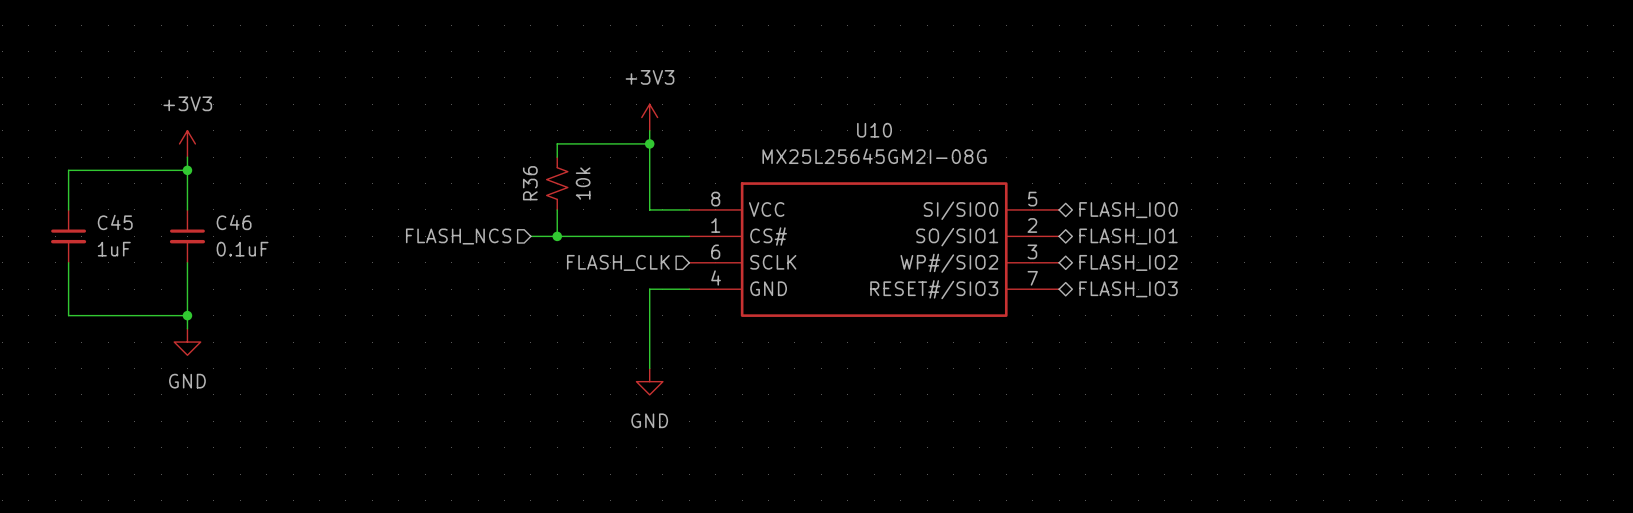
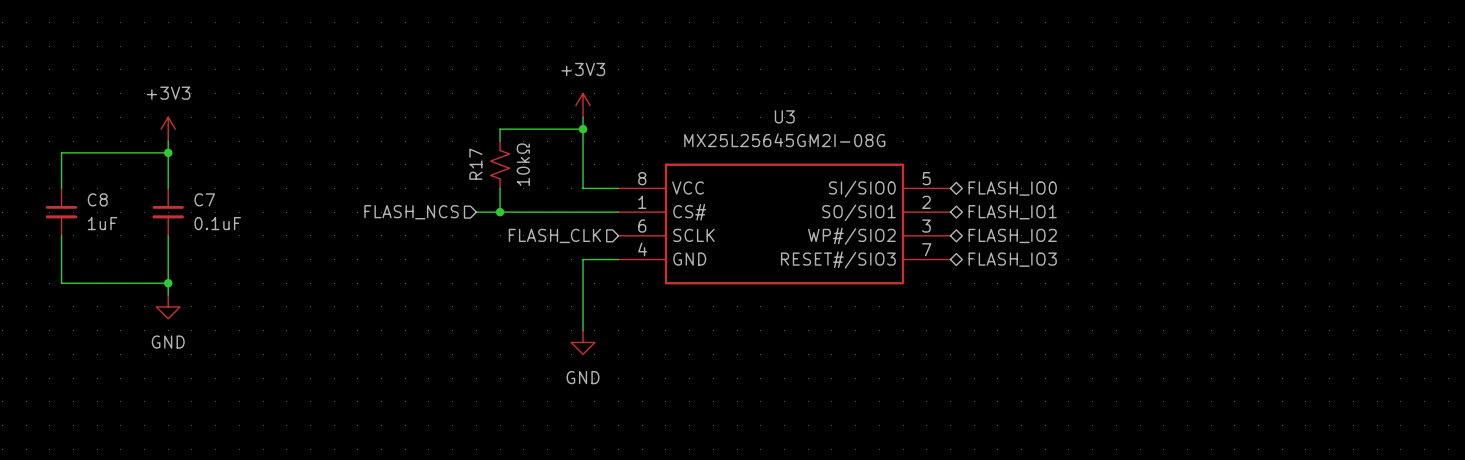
U10 name: U10 (874, 130) -> U3 (784, 116)
R36 name: R36 (530, 183) -> R17 (475, 164)
R36 value: 10k (583, 183) -> 10kΩ (523, 164)
C45 name: C45 (115, 222) -> C8 (97, 199)
C46 name: C46 (234, 222) -> C7 (204, 199)

